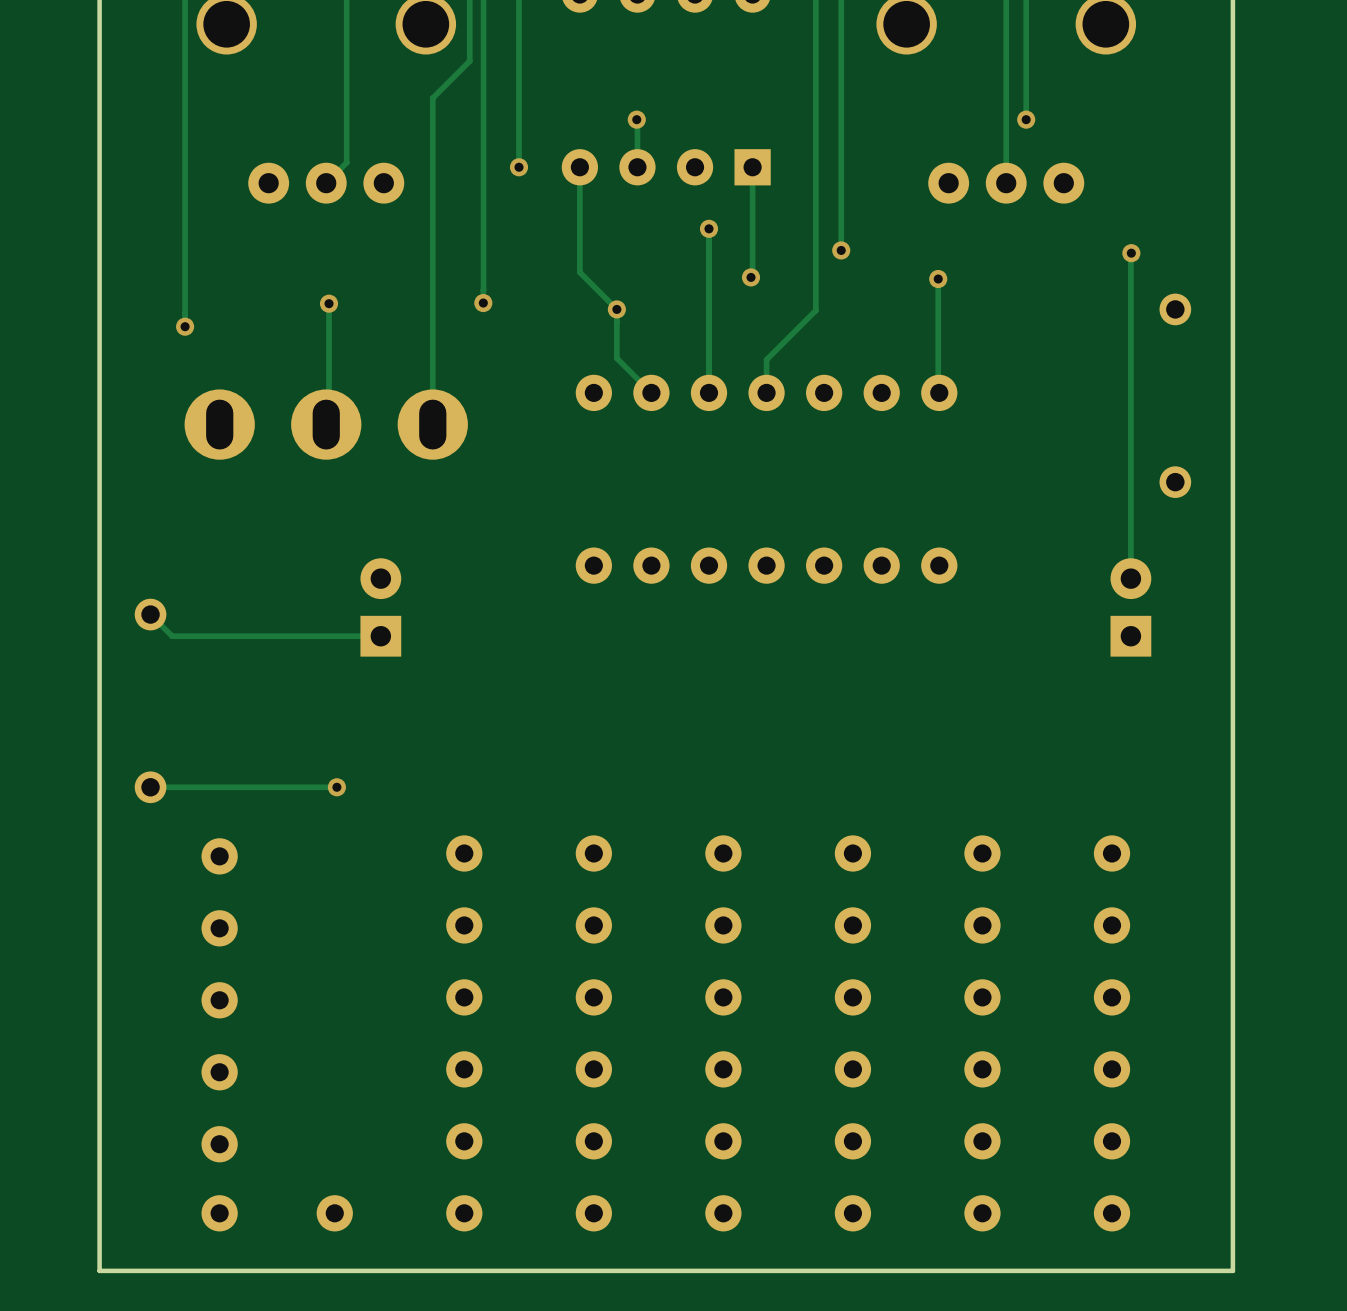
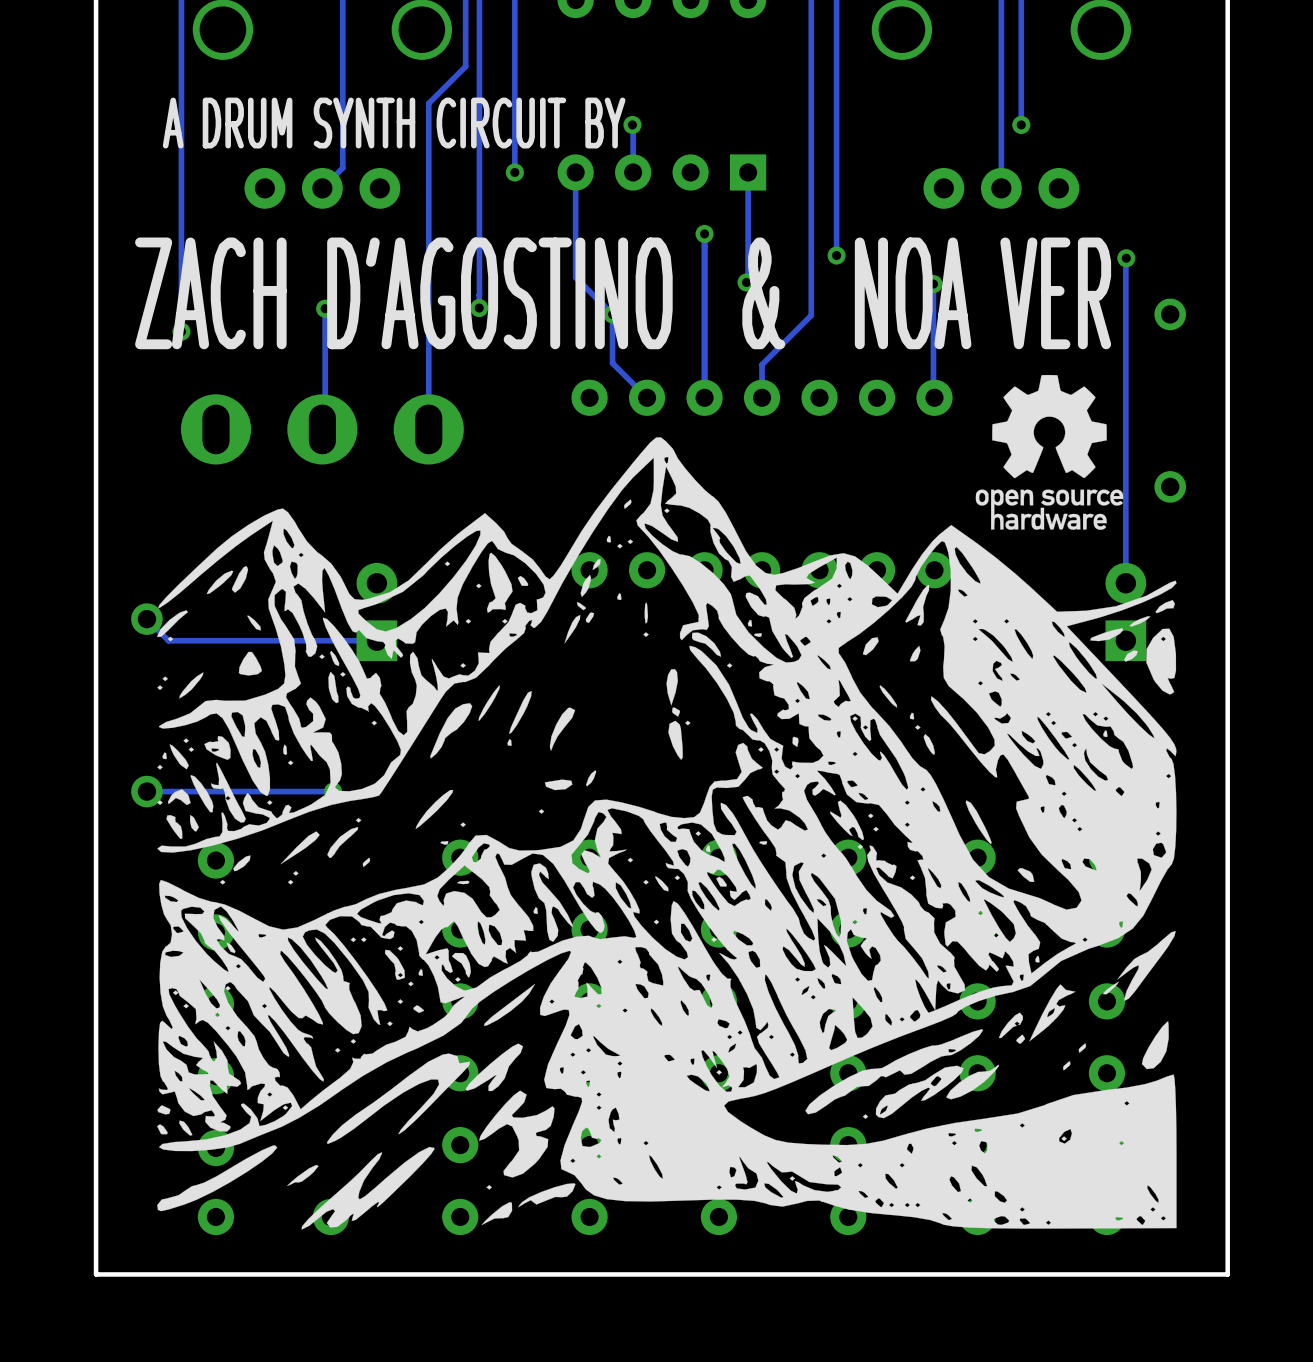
text: none -> A DRUM SYNTH CIRCUIT BY (394, 123)
text: none -> ZACH D'AGOSTINO & NOA VER (623, 293)
drawing: none -> [157, 374, 1177, 1230]

